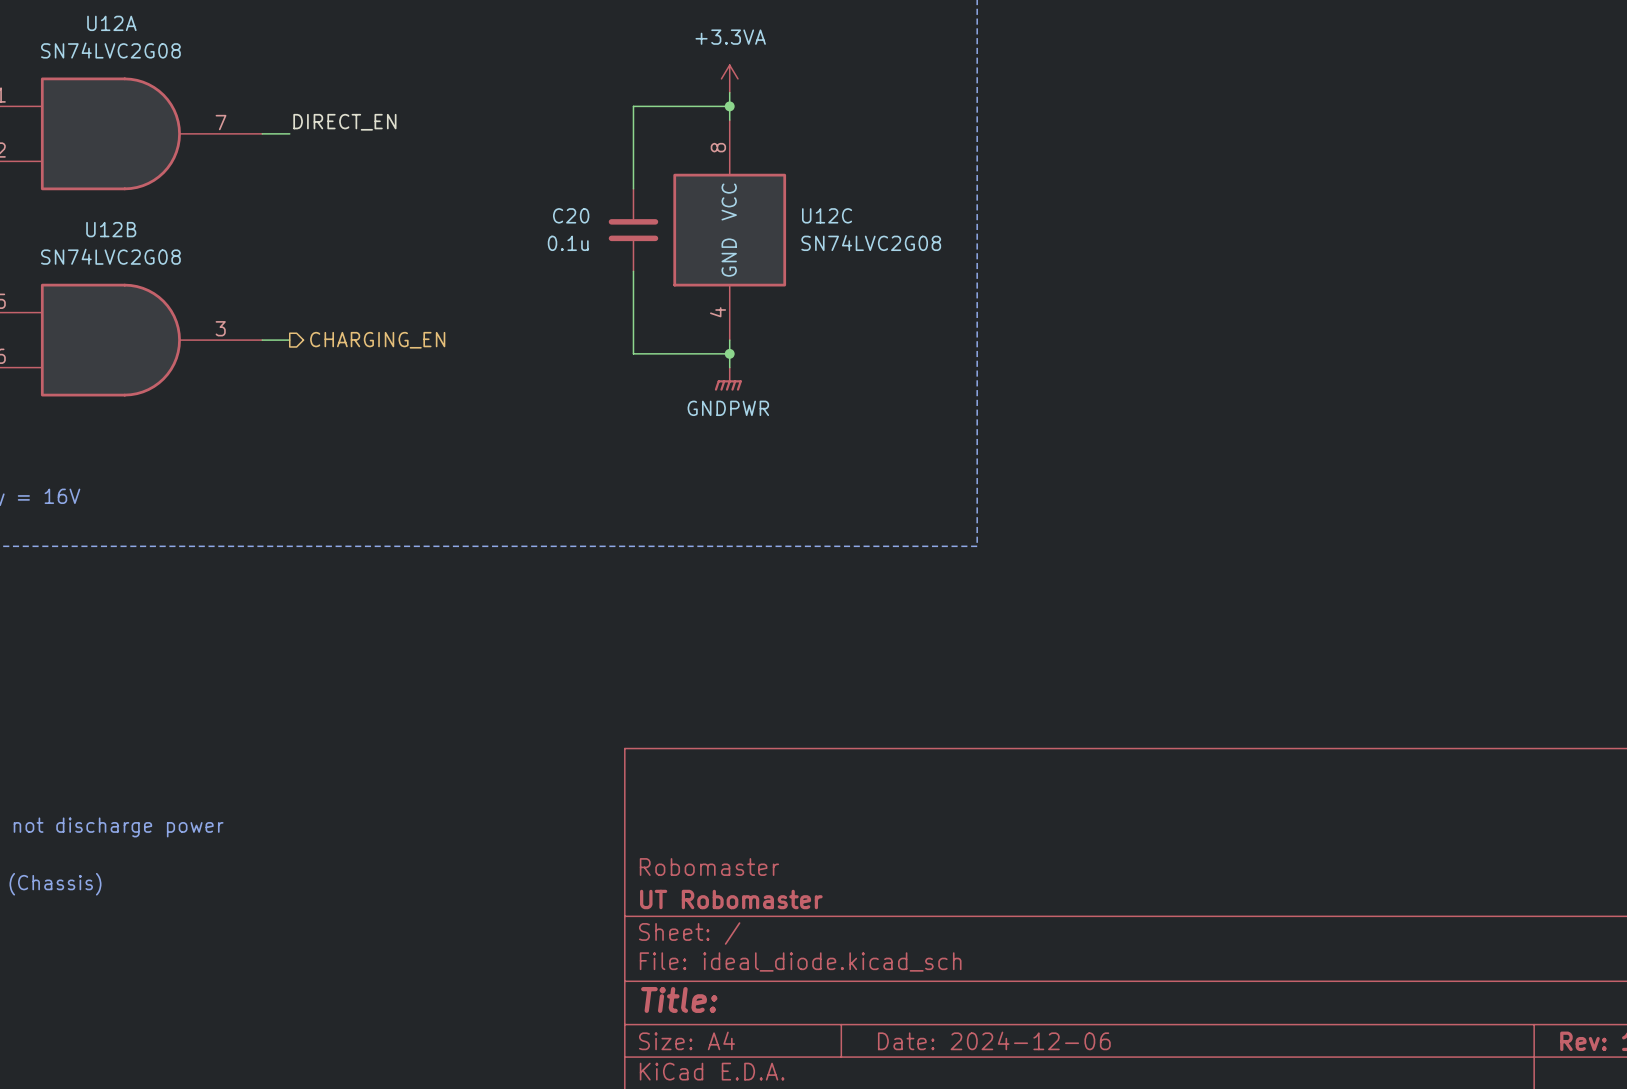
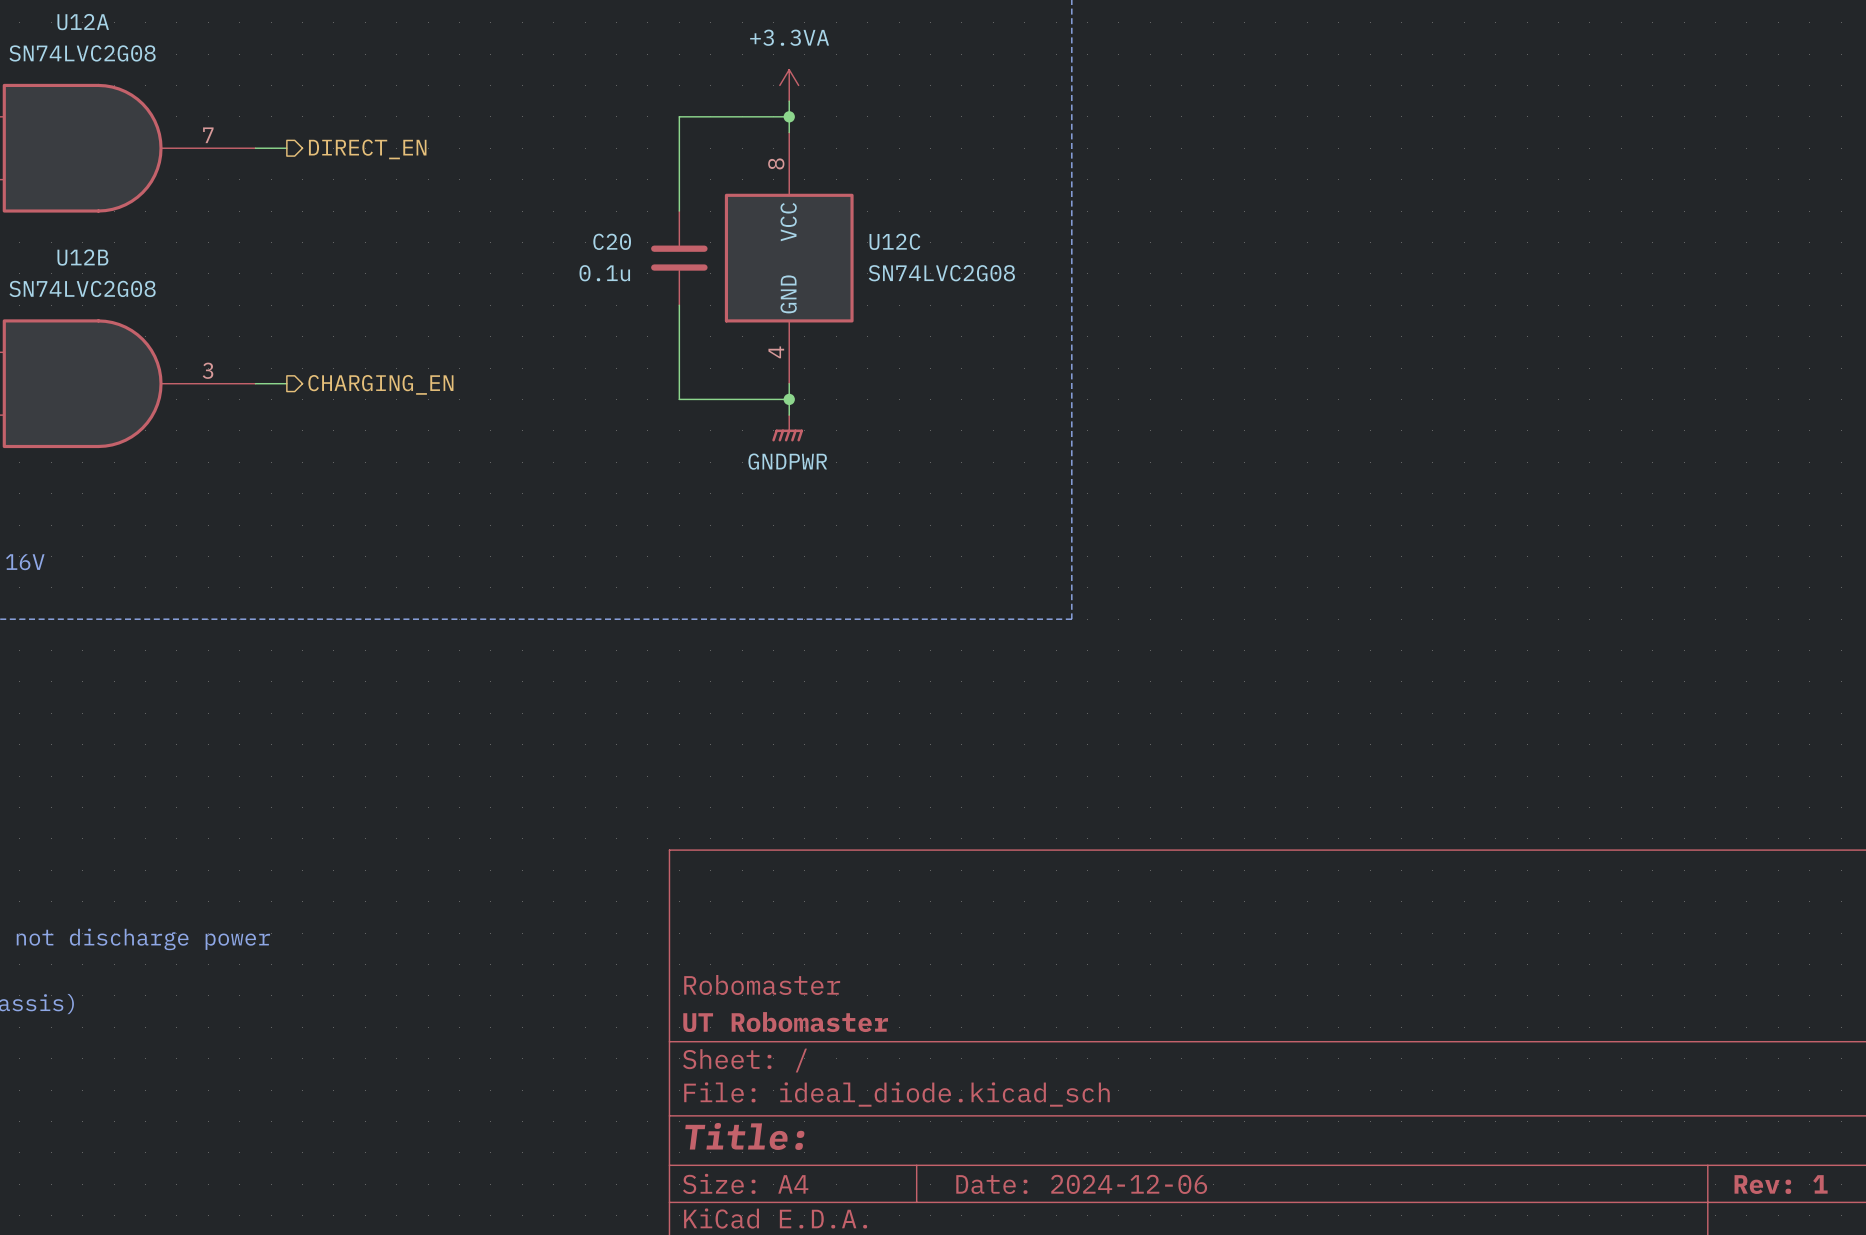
label: DIRECT_EN (344, 122) -> none
hierarchical label: none -> DIRECT_EN (367, 149)

